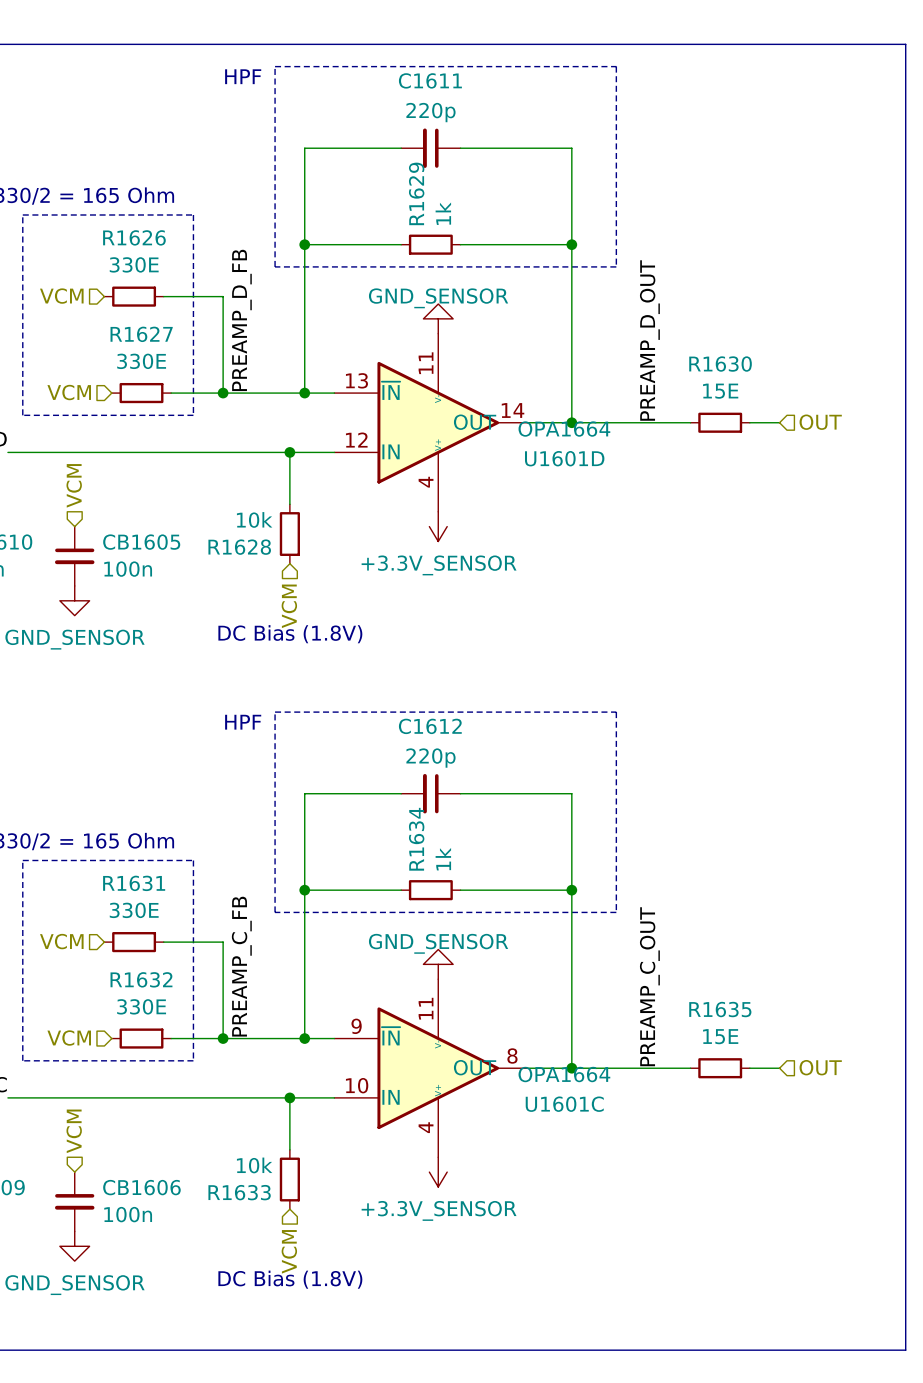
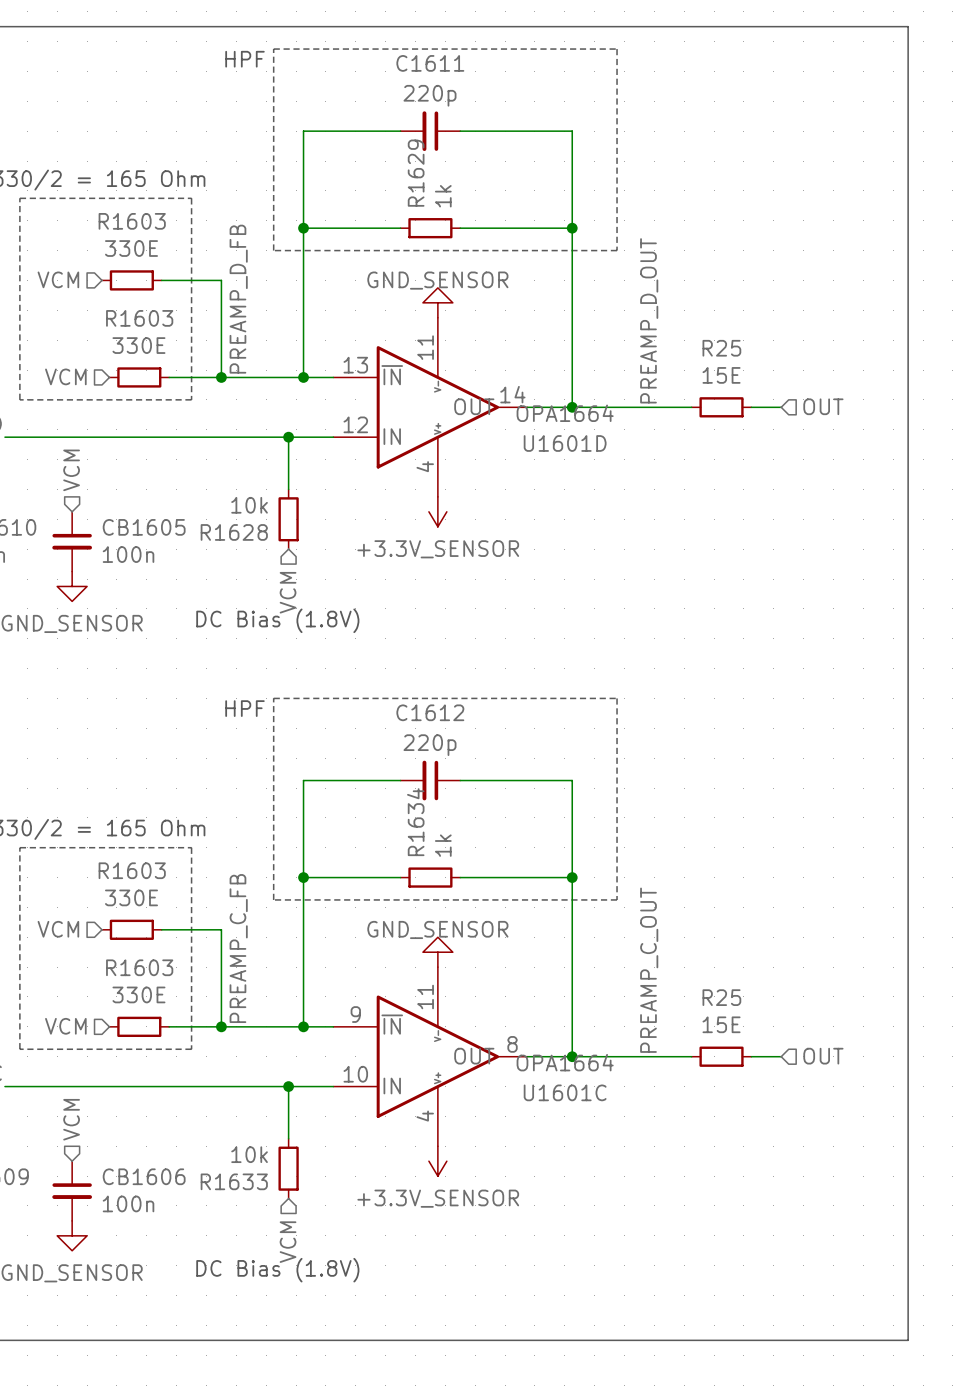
R1626 name: R1626 (134, 237) -> R1603 (132, 221)
R1627 name: R1627 (141, 334) -> R1603 (139, 318)
R1630 name: R1630 (720, 364) -> R25 (721, 348)
R1631 name: R1631 (134, 883) -> R1603 (132, 870)
R1632 name: R1632 (141, 979) -> R1603 (139, 967)
R1635 name: R1635 (720, 1009) -> R25 (721, 997)

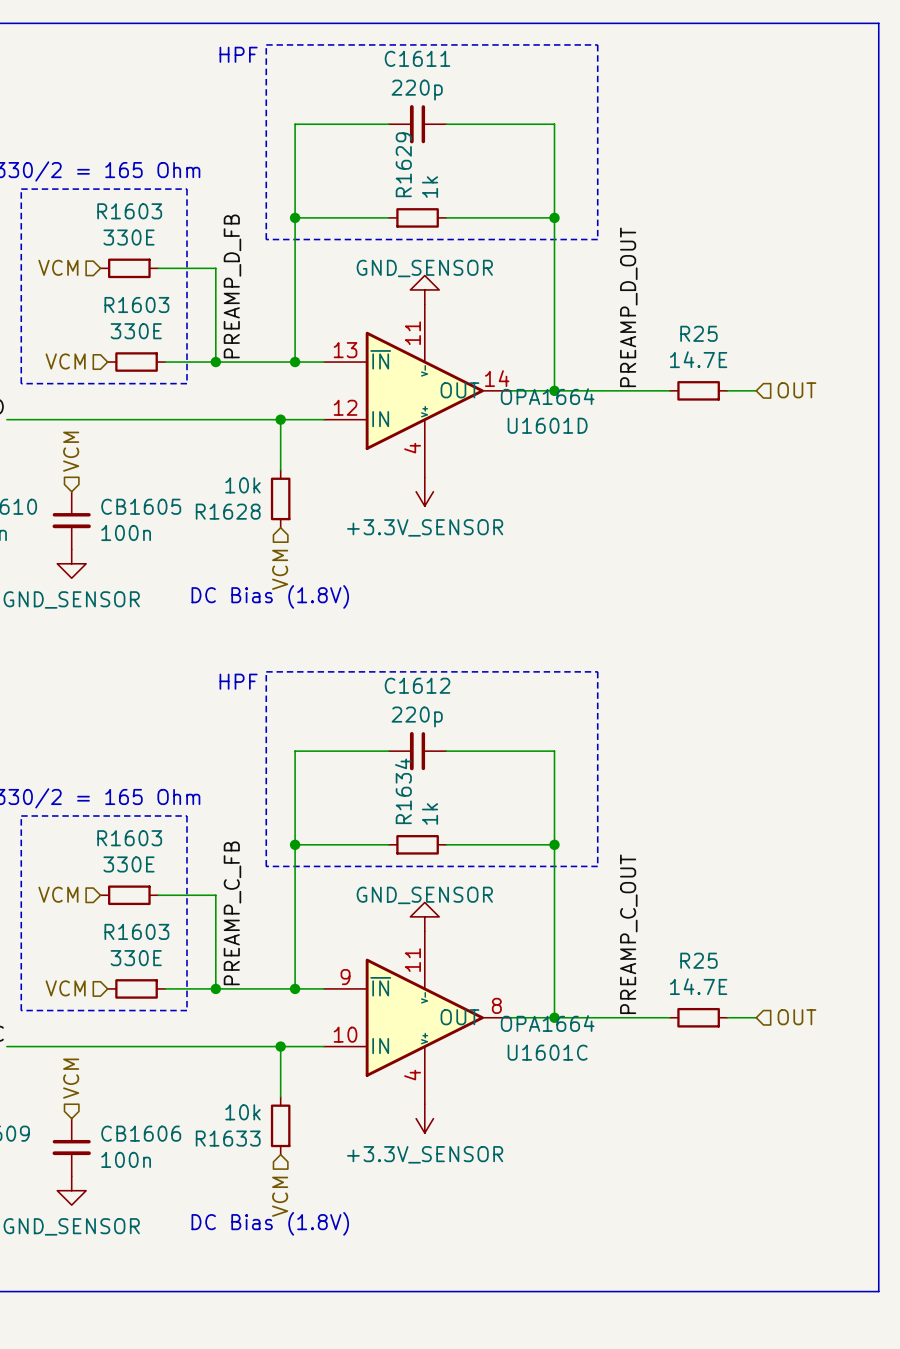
R25 value: 15E (721, 375) -> 14.7E (698, 359)
R25 value: 15E (721, 1024) -> 14.7E (698, 986)

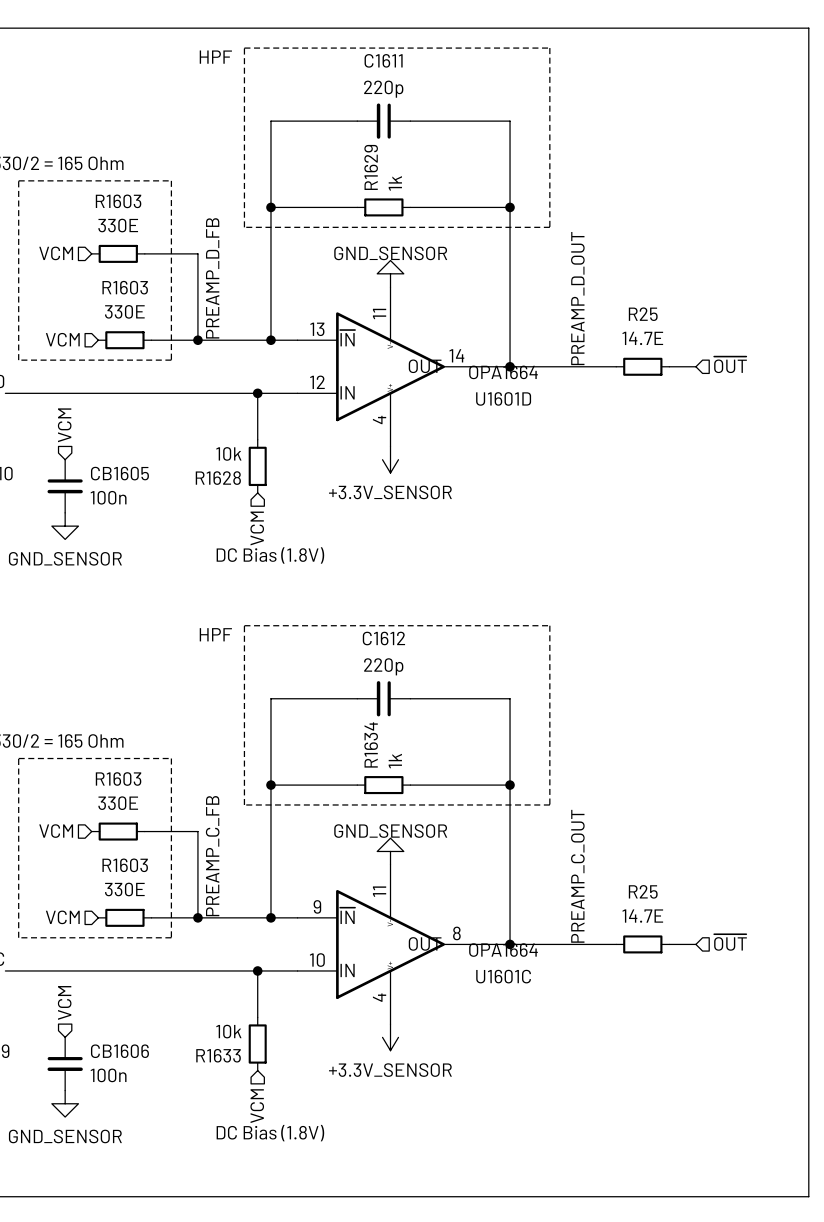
hierarchical label: OUT (796, 390) -> ~{OUT} (730, 364)
hierarchical label: OUT (796, 1017) -> ~{OUT} (730, 942)

